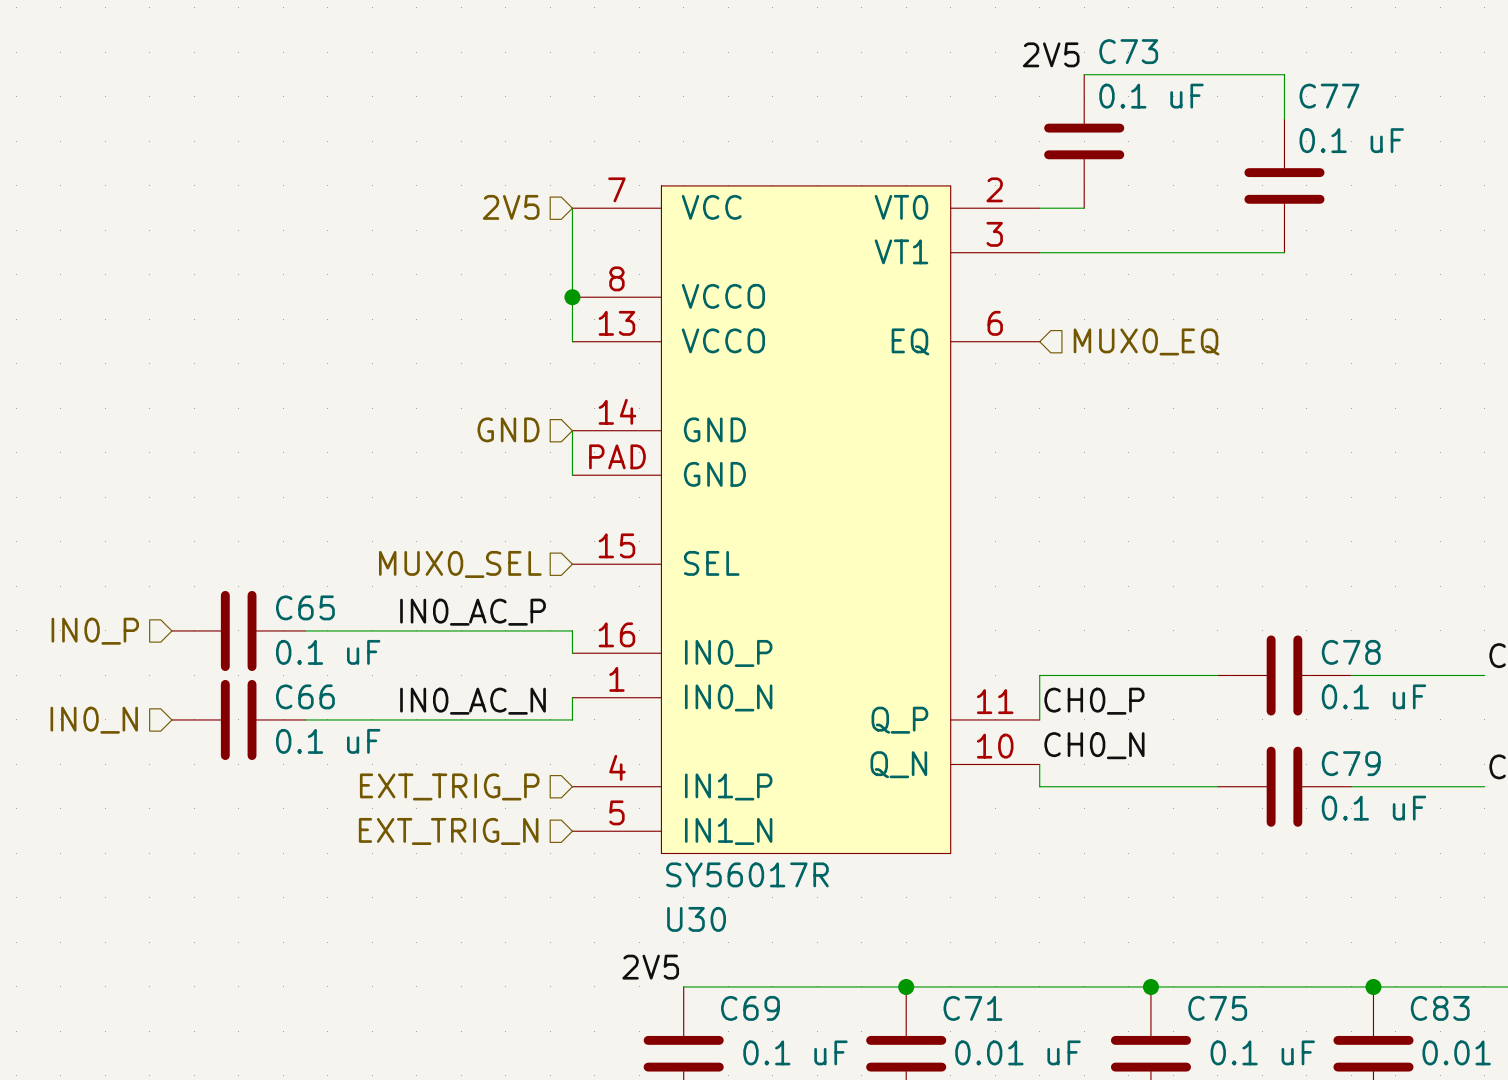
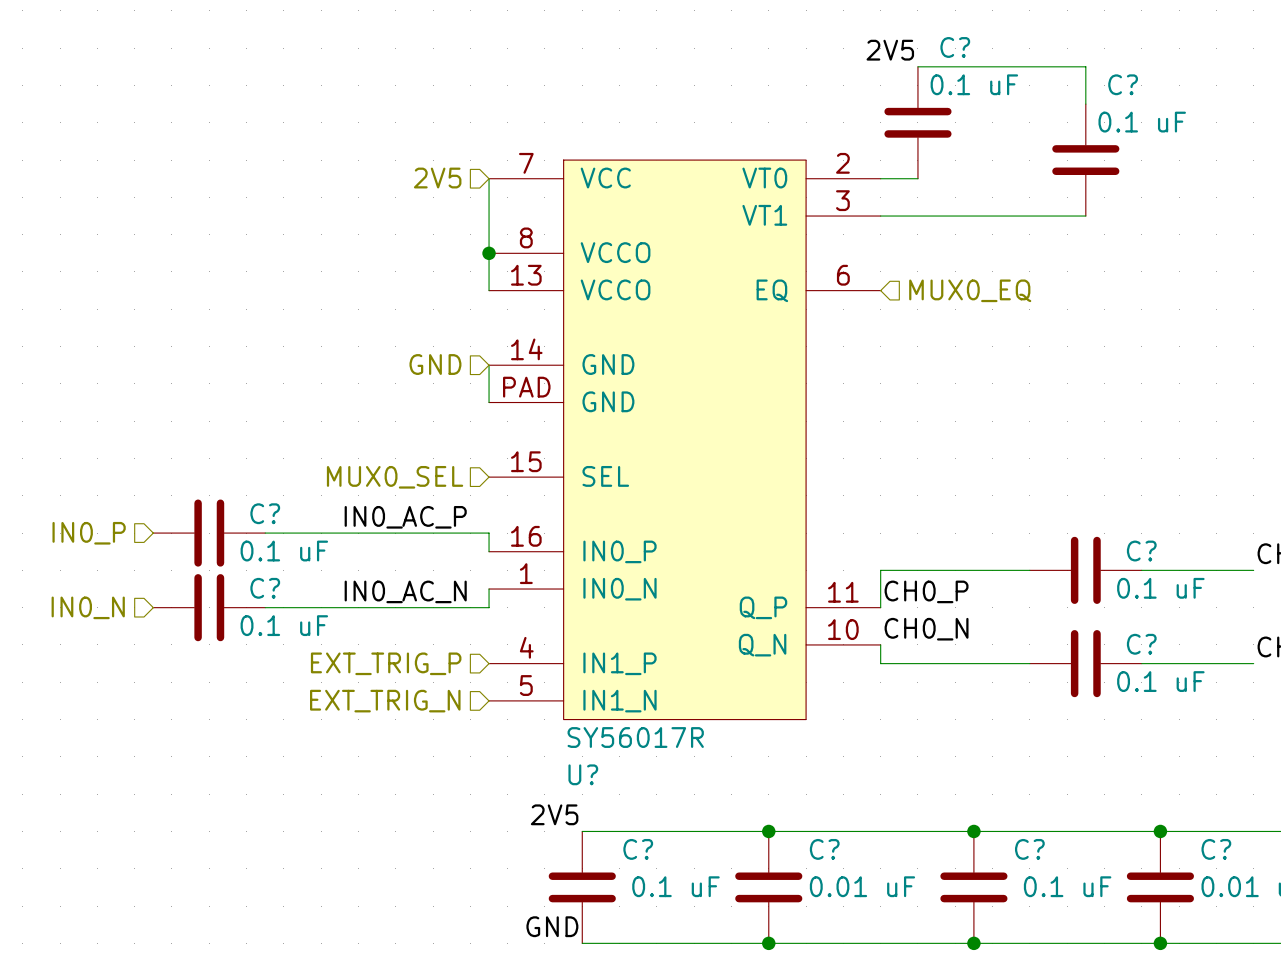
C73 name: C73 (1128, 51) -> C? (955, 47)
C77 name: C77 (1329, 96) -> C? (1123, 84)
C65 name: C65 (305, 607) -> C? (265, 513)
C78 name: C78 (1351, 652) -> C? (1141, 551)
C66 name: C66 (305, 696) -> C? (265, 588)
C79 name: C79 (1351, 763) -> C? (1141, 644)
U30 name: U30 (696, 919) -> U? (583, 774)
C69 name: C69 (750, 1008) -> C? (638, 849)
C71 name: C71 (972, 1008) -> C? (824, 849)
C75 name: C75 (1217, 1008) -> C? (1029, 849)
C83 name: C83 (1440, 1008) -> C? (1216, 849)

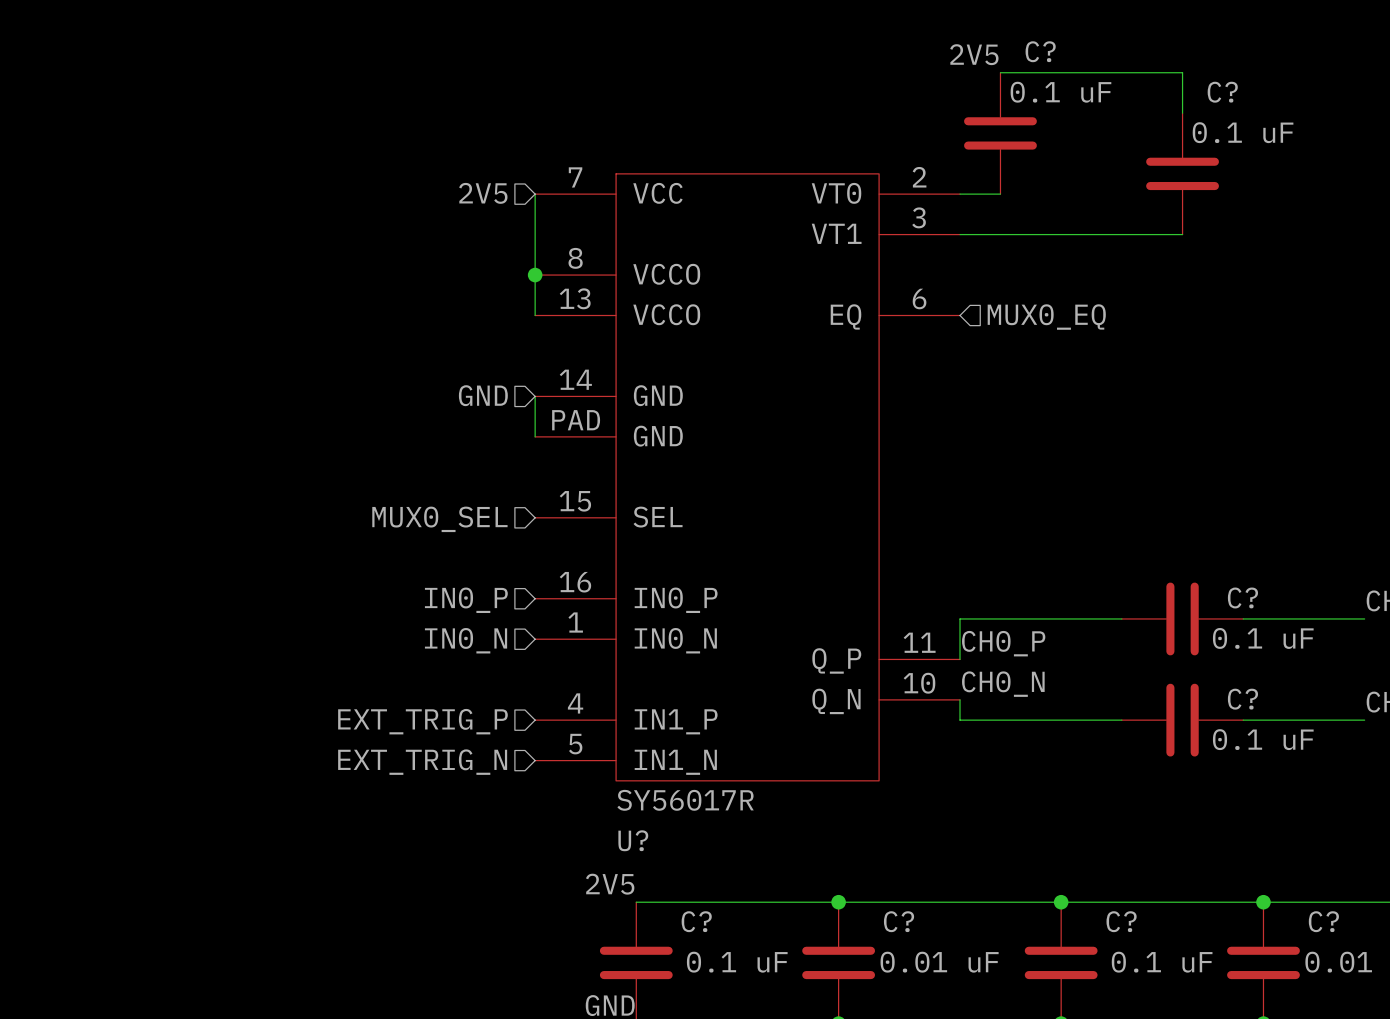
label: IN0_AC_P (405, 517) -> none
hierarchical label position: IN0_P (89, 533) -> IN0_P (466, 600)
C?: 0.1 uF (209, 533) -> none
wire: (265, 533) (489, 533) (489, 551) -> none
wire: (489, 589) (489, 607) (265, 607) -> none
label: IN0_AC_N (405, 591) -> none
hierarchical label position: IN0_N (88, 607) -> IN0_N (466, 640)
C?: 0.1 uF (209, 607) -> none

